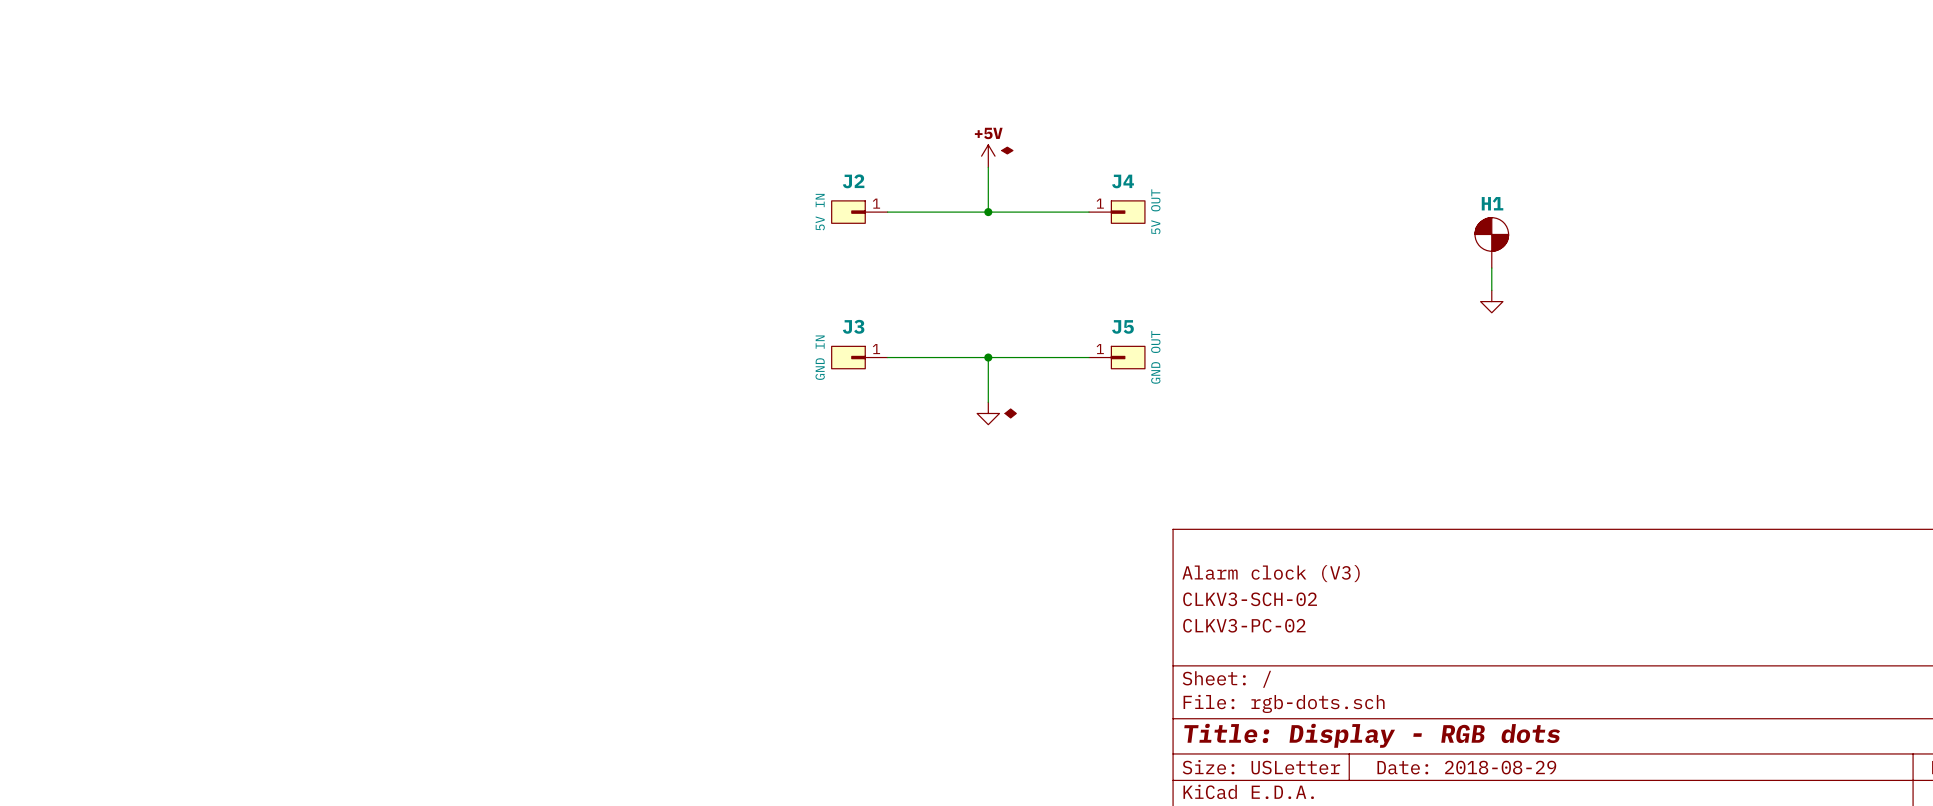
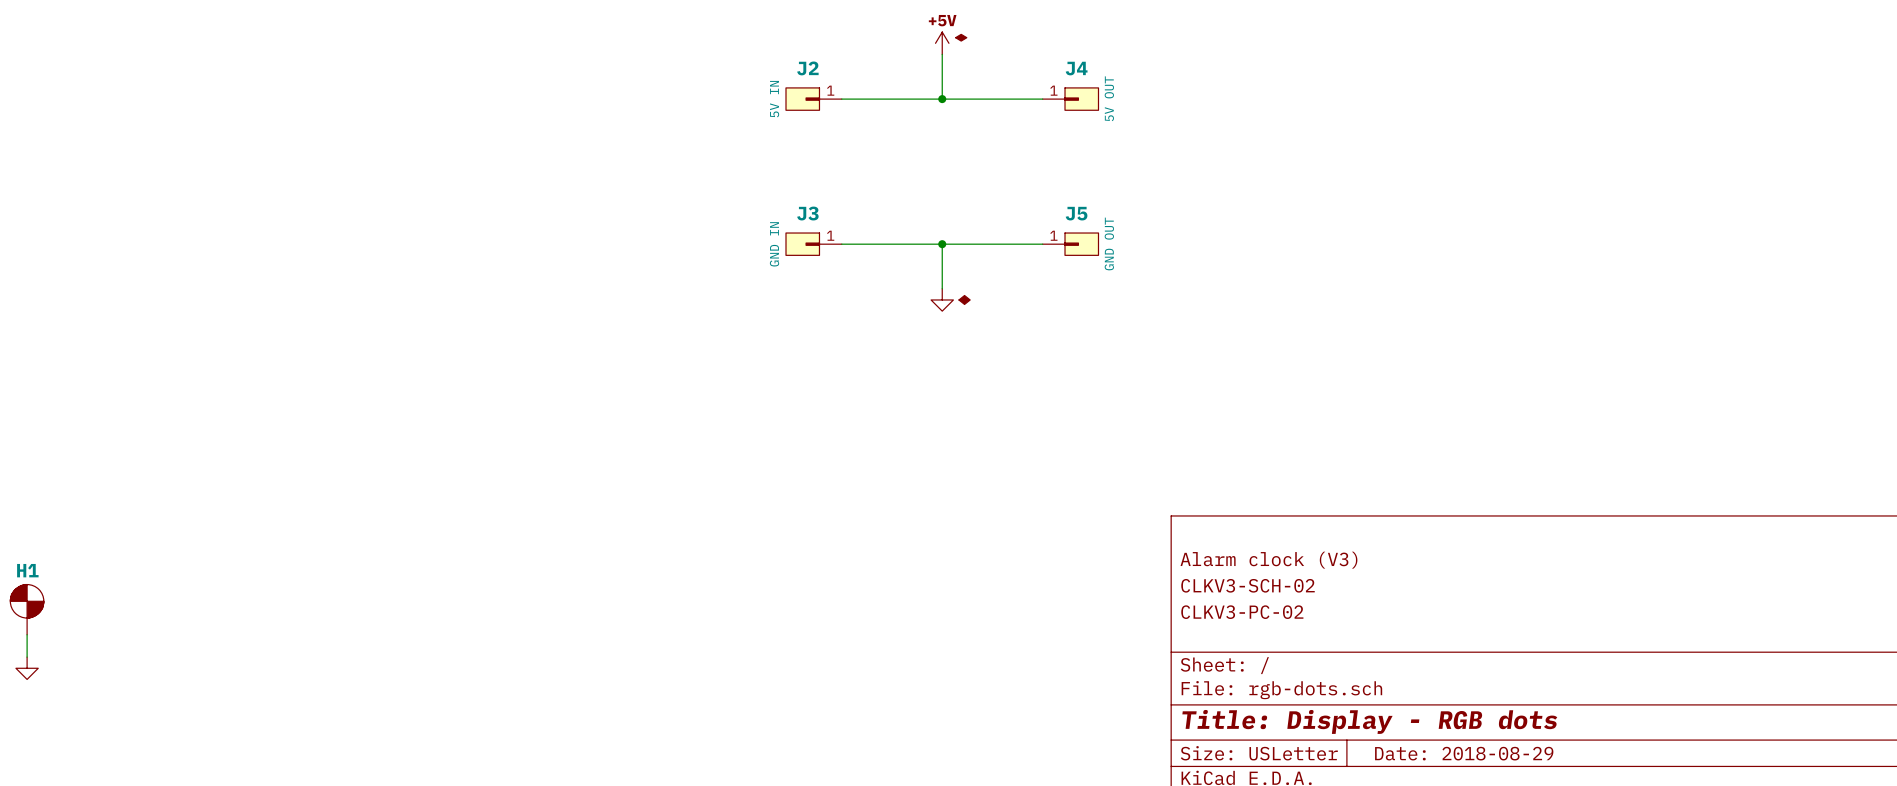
junction: none -> (942, 99)
power symbol position: (997, 156) -> (951, 43)
wire: (988, 167) (988, 212) -> (942, 54) (942, 99)
J2 position: (859, 212) -> (813, 99)
wire: (887, 212) (1089, 212) -> (841, 99) (1042, 99)
junction: (988, 212) -> none
J4 position: (1116, 212) -> (1070, 99)
H1 position: (1491, 242) -> (27, 609)
junction: none -> (942, 244)
wire: (1491, 268) (1491, 290) -> none
power symbol: (1491, 301) -> none
J3 position: (859, 357) -> (813, 244)
wire: (887, 357) (1089, 357) -> (841, 244) (1042, 244)
wire: (988, 357) (988, 402) -> (942, 244) (942, 288)
junction: (988, 357) -> none
J5 position: (1116, 357) -> (1070, 244)
power symbol position: (996, 413) -> (950, 299)
wire: none -> (27, 634) (27, 657)
power symbol: none -> (27, 668)

